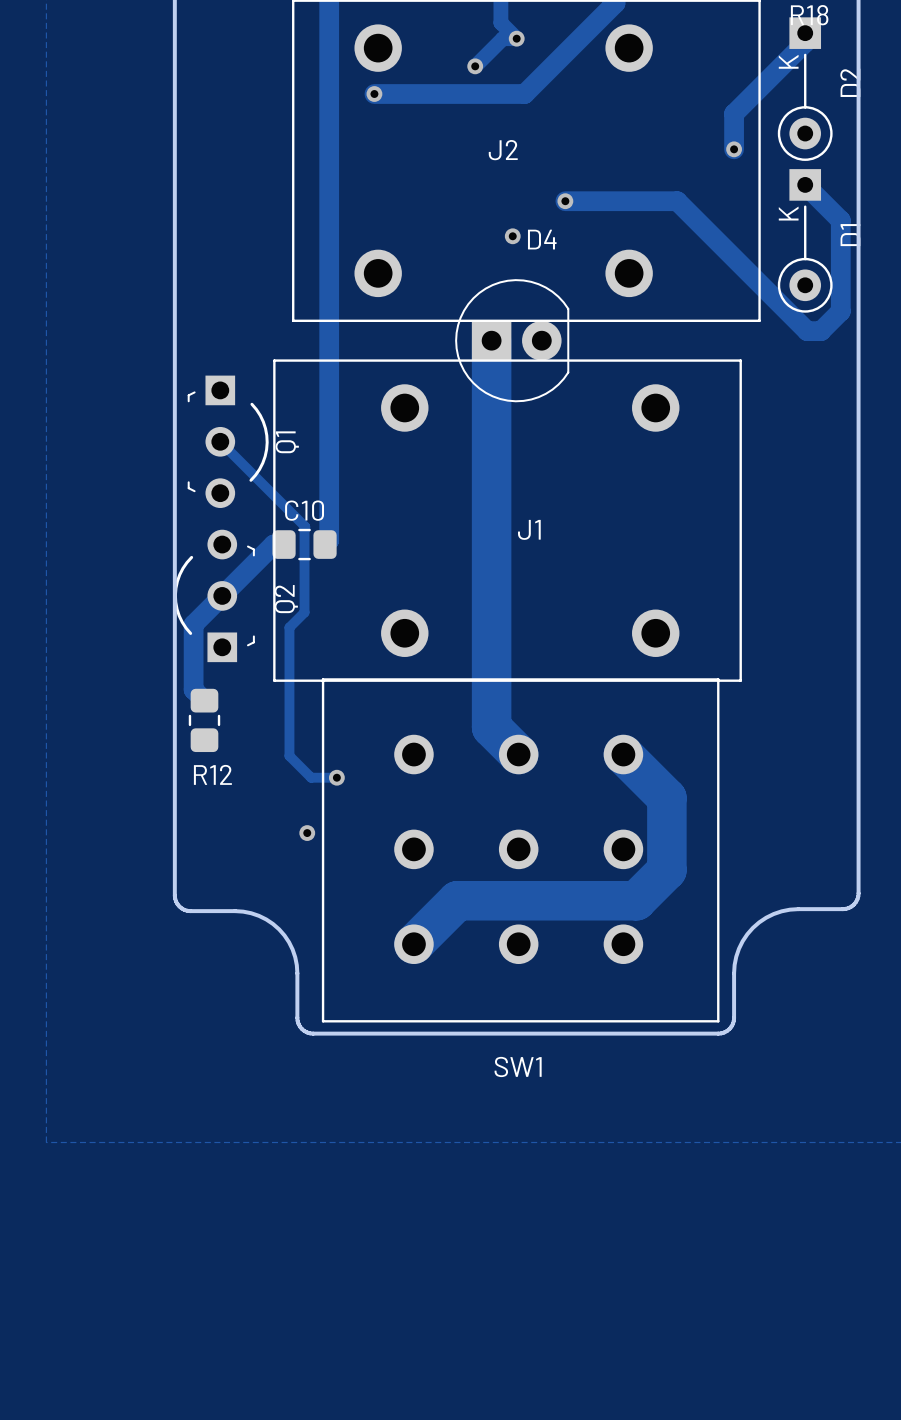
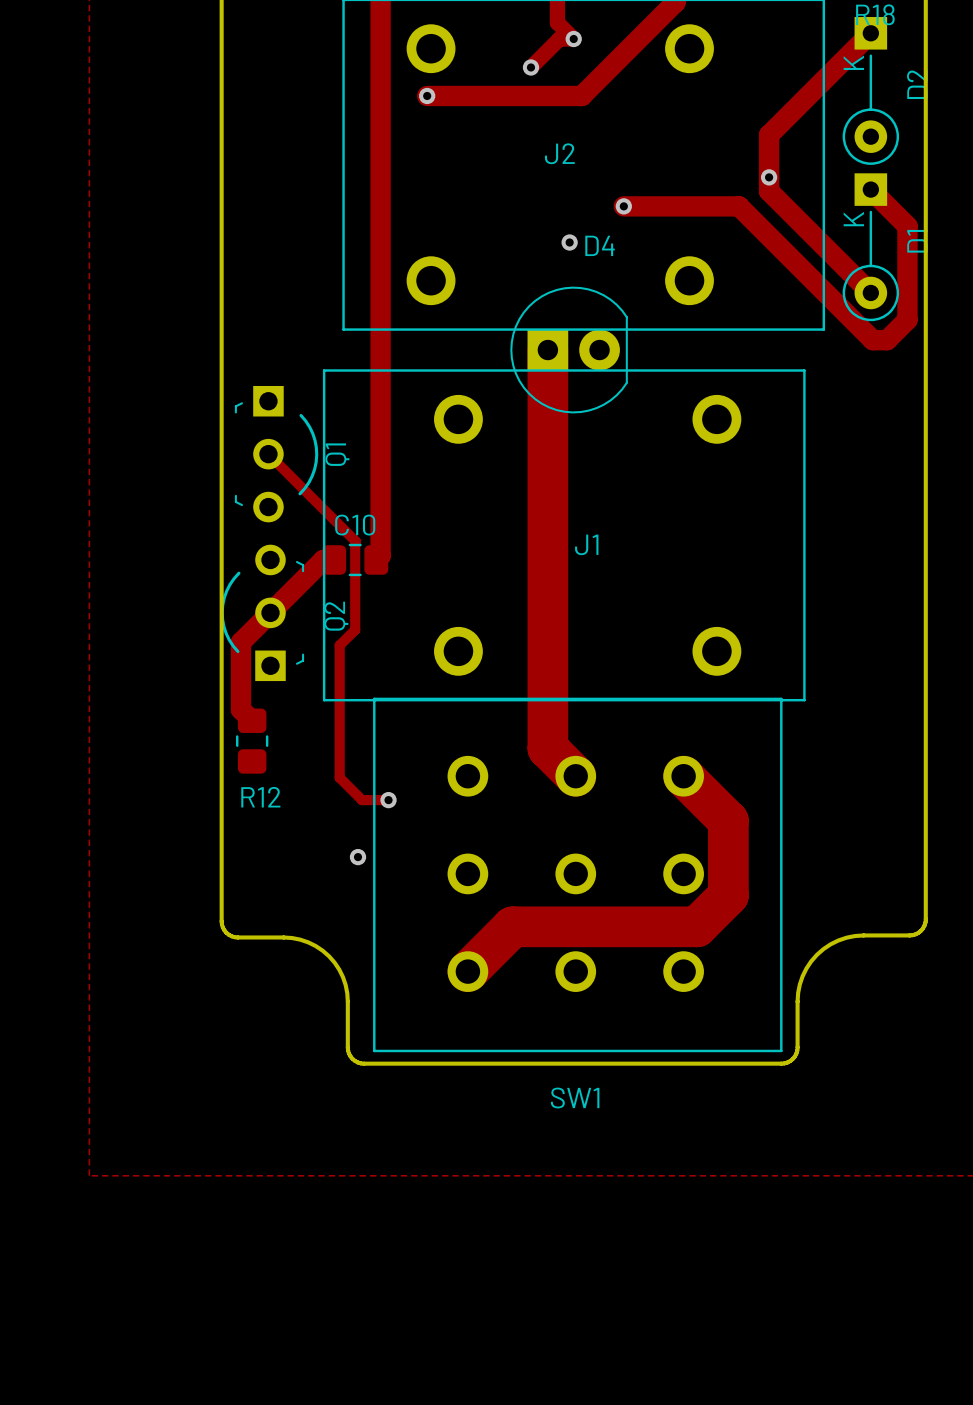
track: (805, 33) (805, 42) (734, 113) (734, 149) -> (870, 33) (769, 135) (769, 191) (870, 292)
via position: (734, 149) -> (769, 177)

